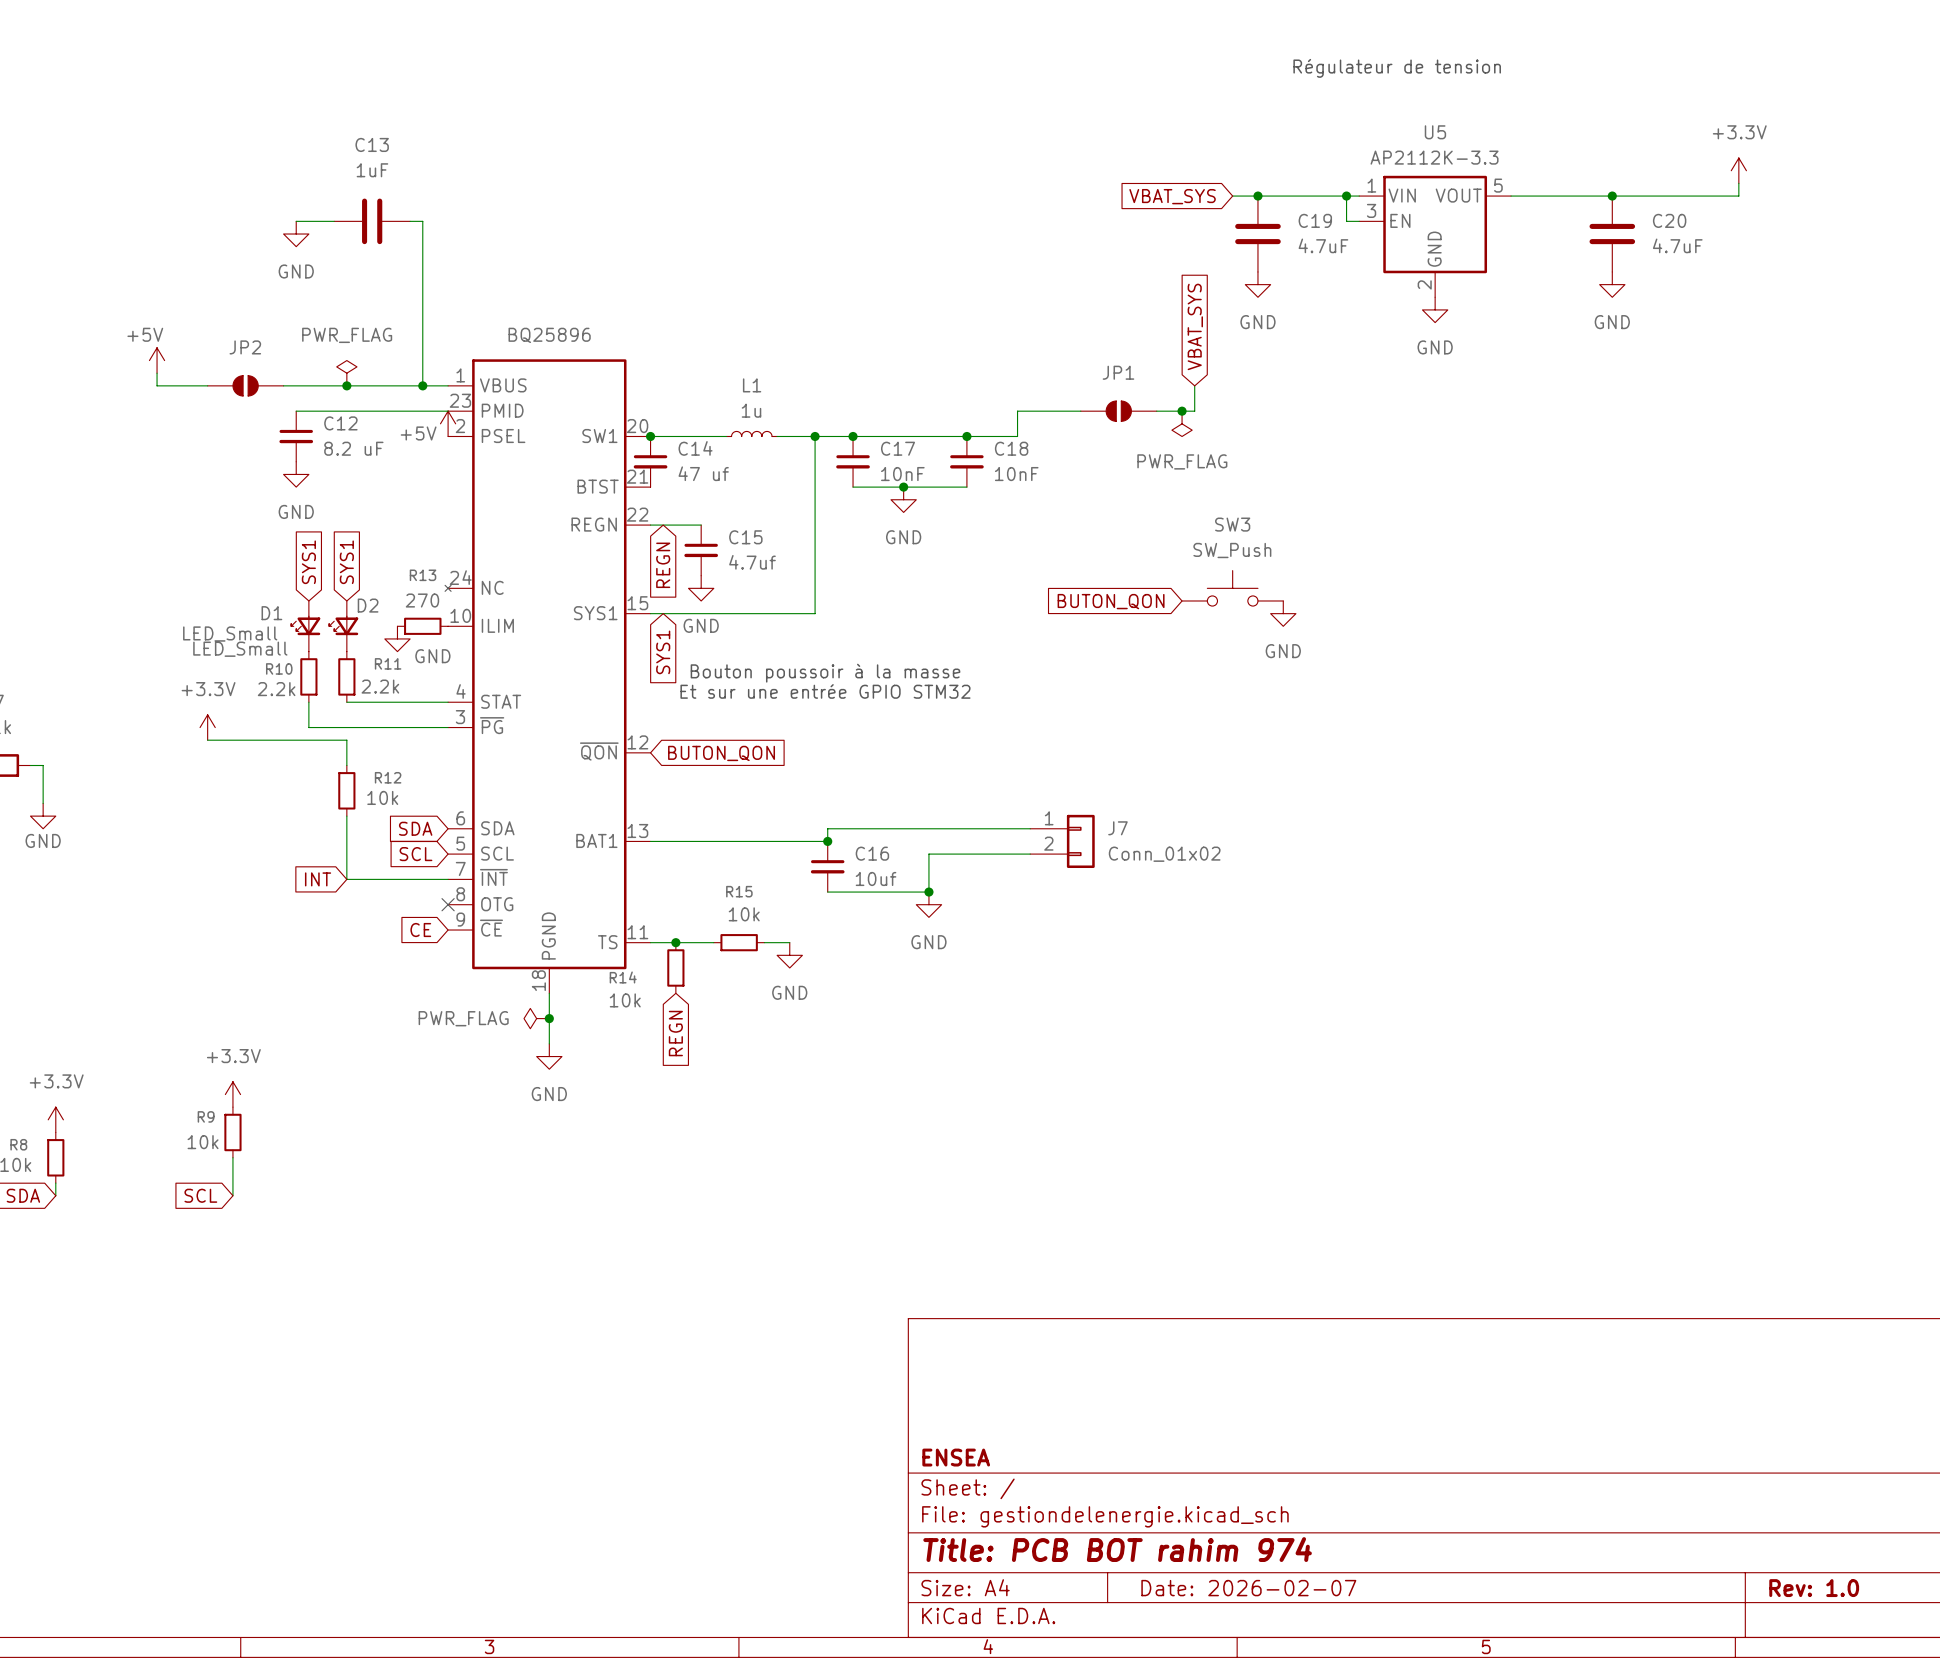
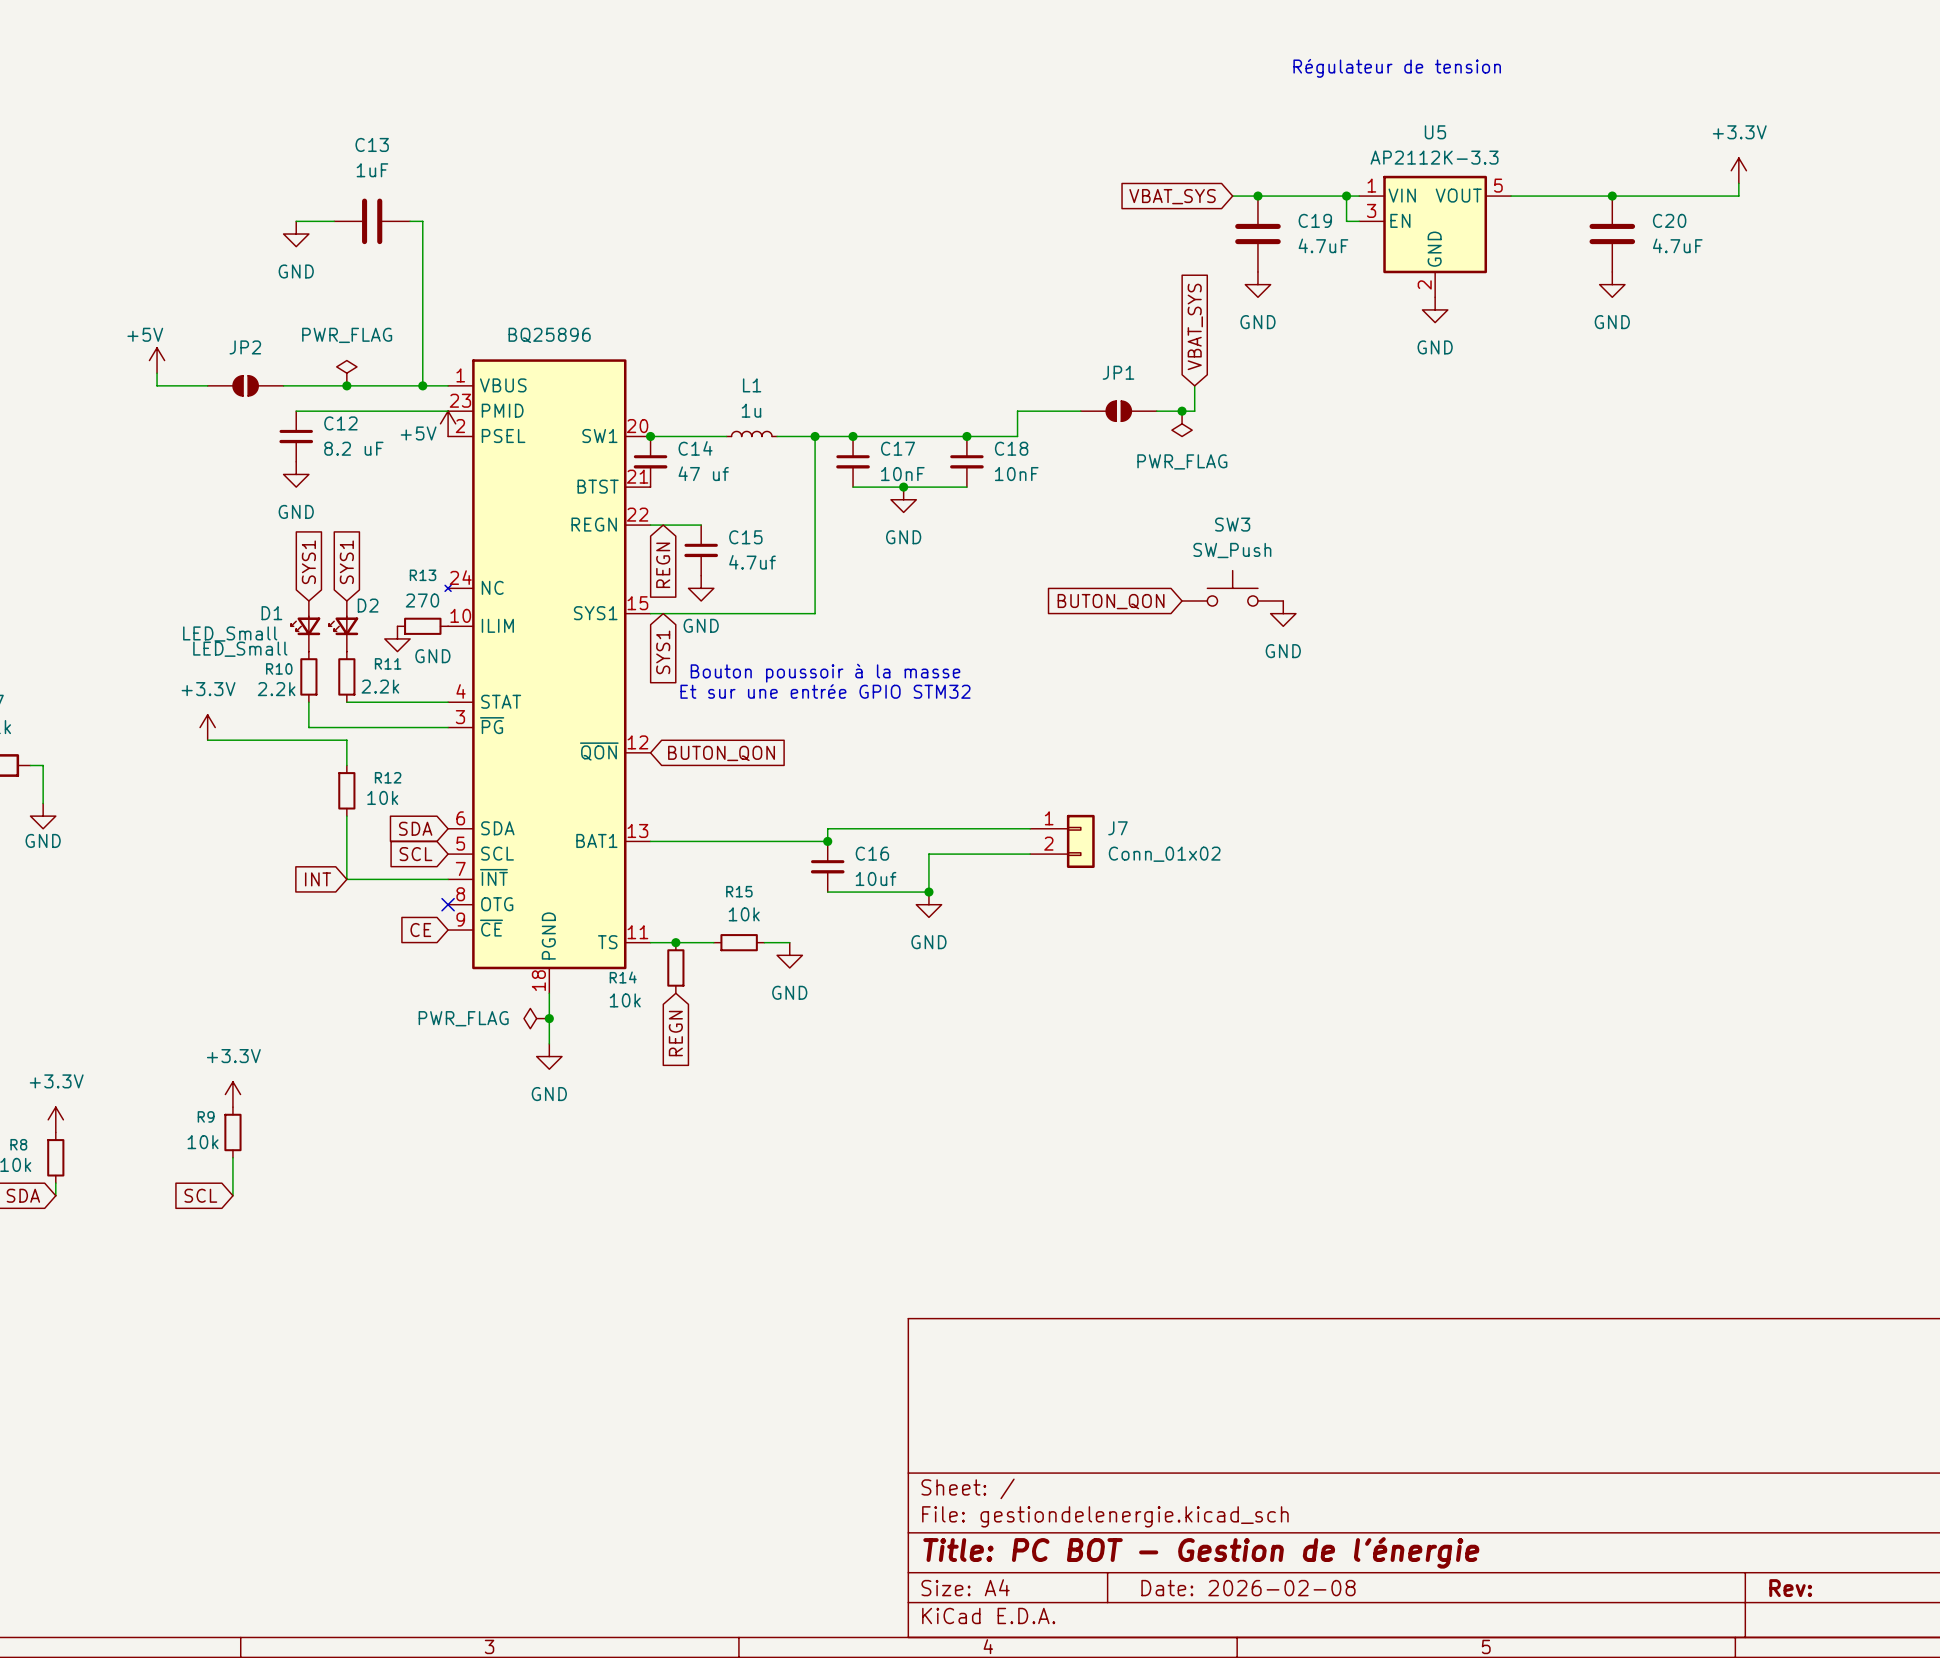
title block: ENSEA (956, 1457) -> none
title block: Title: PCB BOT rahim 974 (1117, 1549) -> Title: PC BOT - Gestion de l'énergie (1201, 1552)
title block: Date: 2026-02-07 (1248, 1588) -> Date: 2026-02-08 (1248, 1588)
title block: Rev: 1.0 (1814, 1588) -> Rev: (1790, 1588)

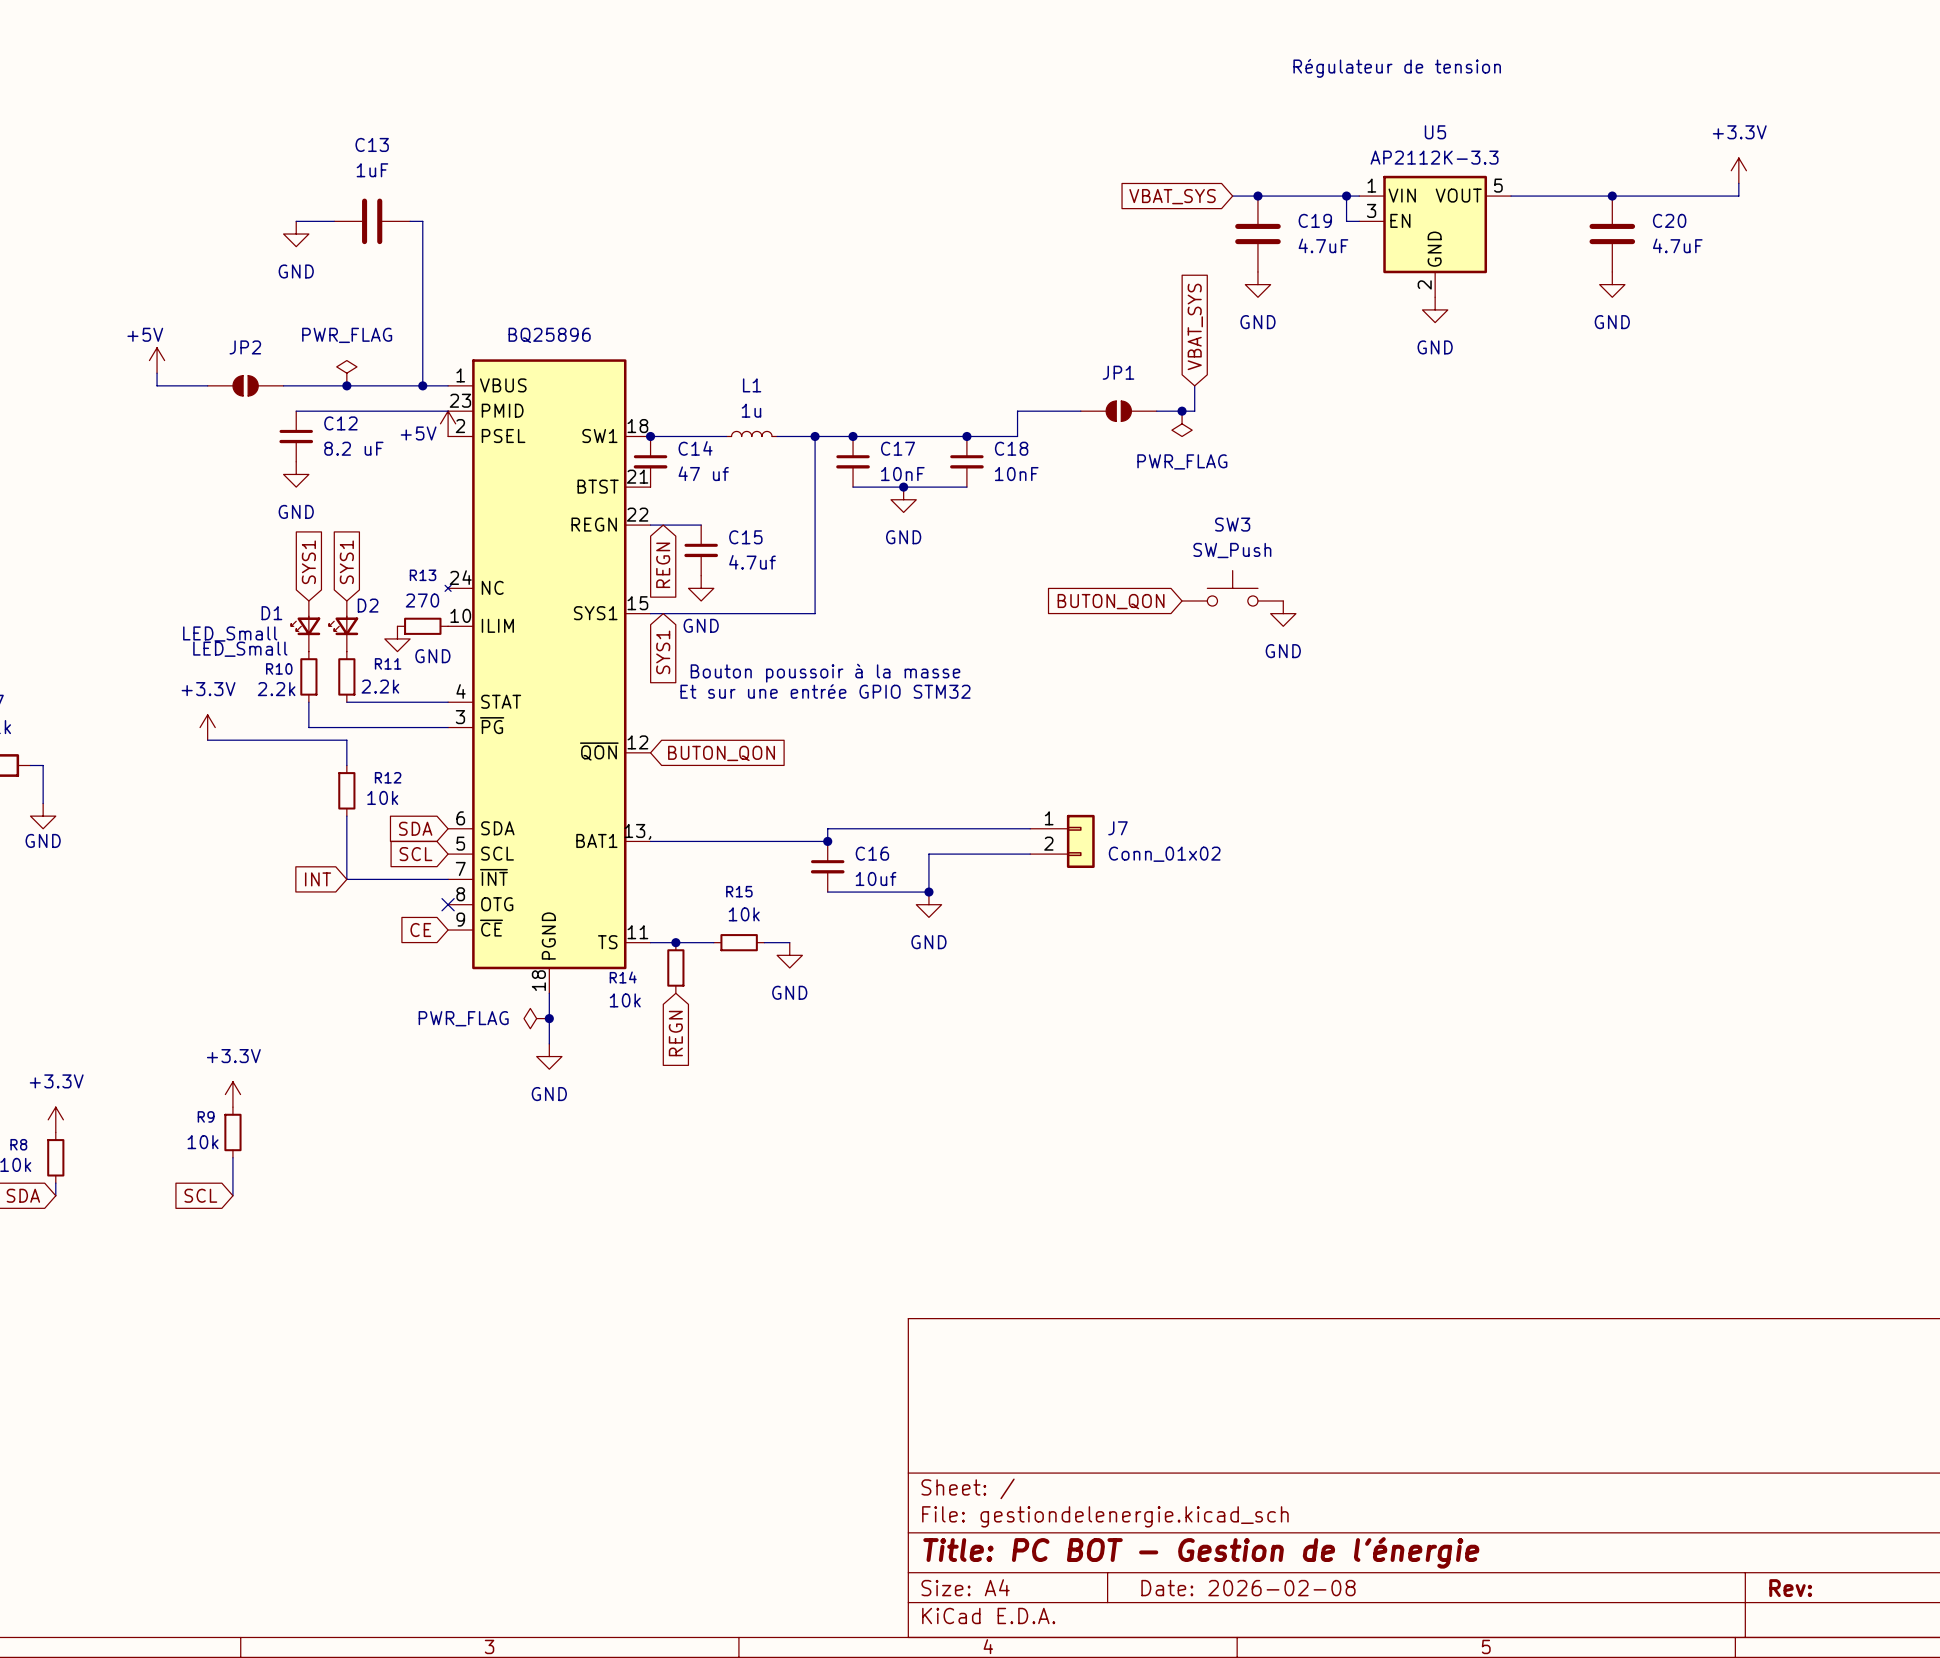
part pin number: 20 (637, 426) -> 18 (637, 426)
part pin number: 13 (637, 830) -> 13, (637, 831)

